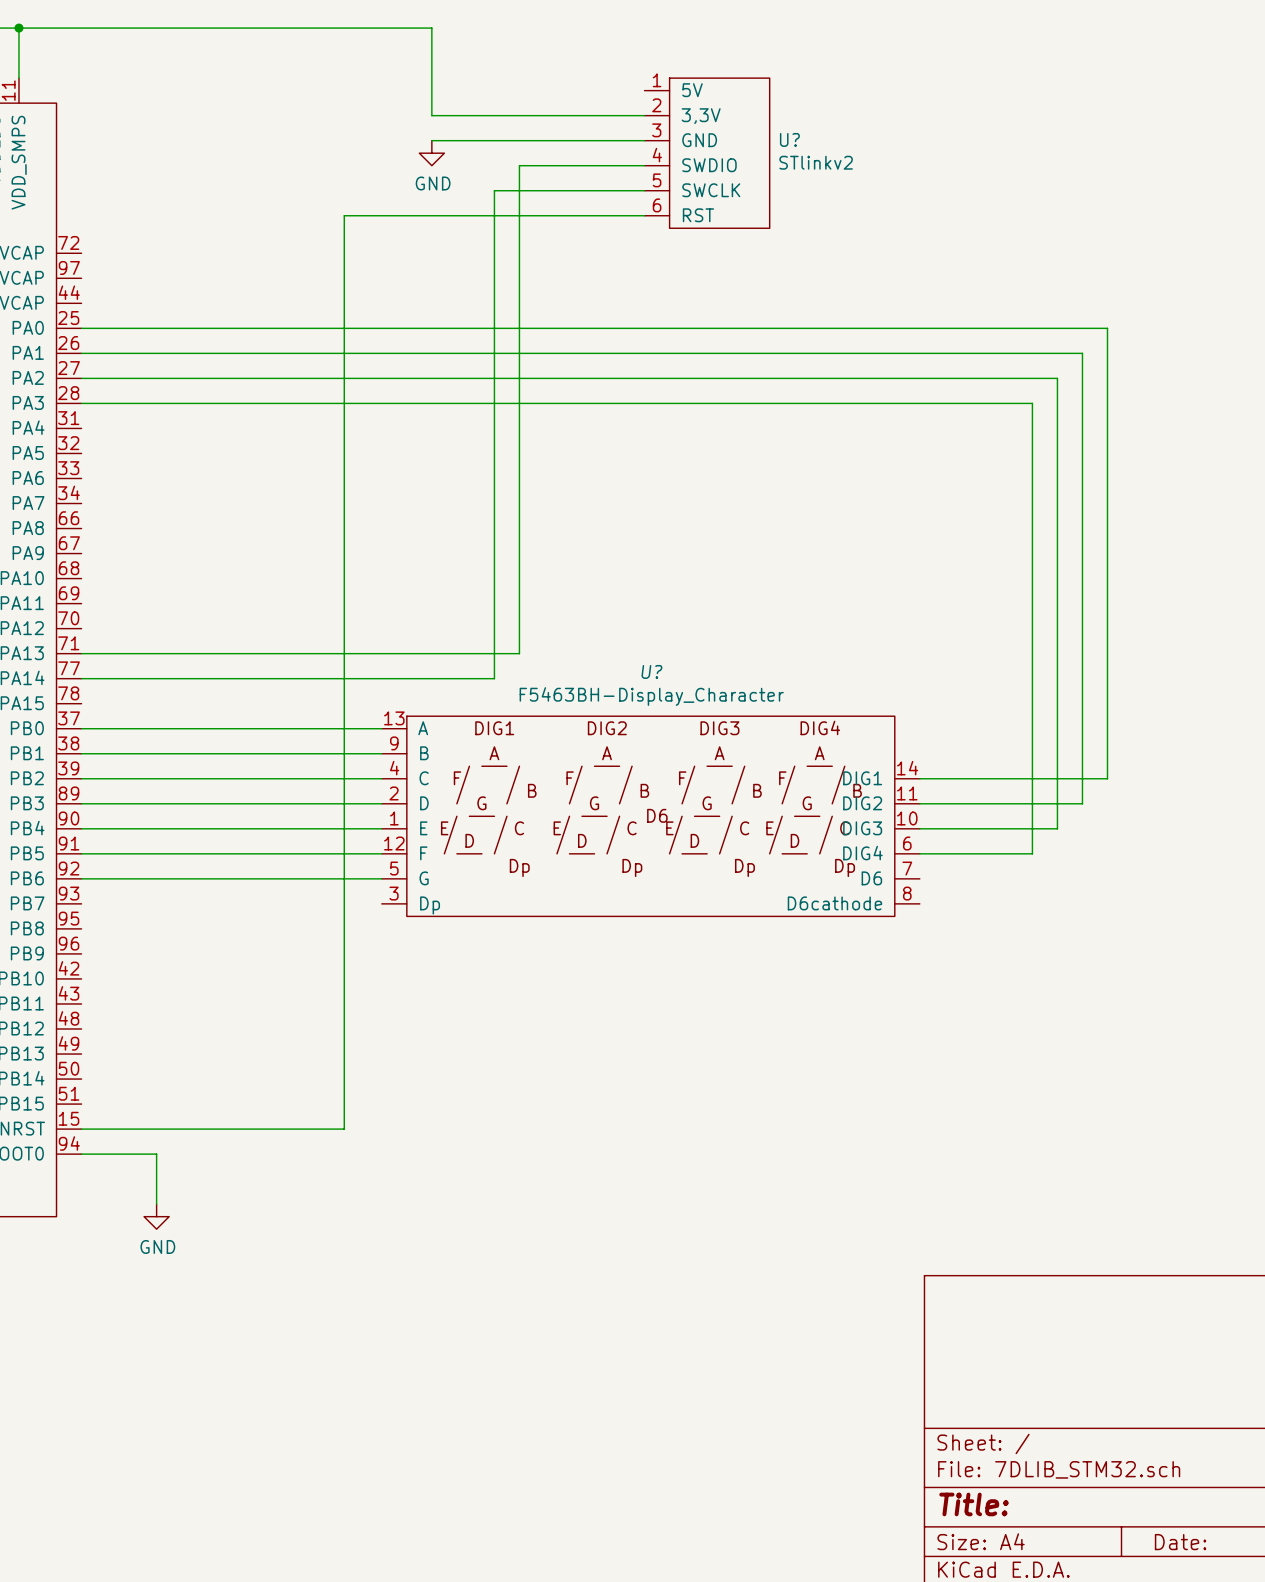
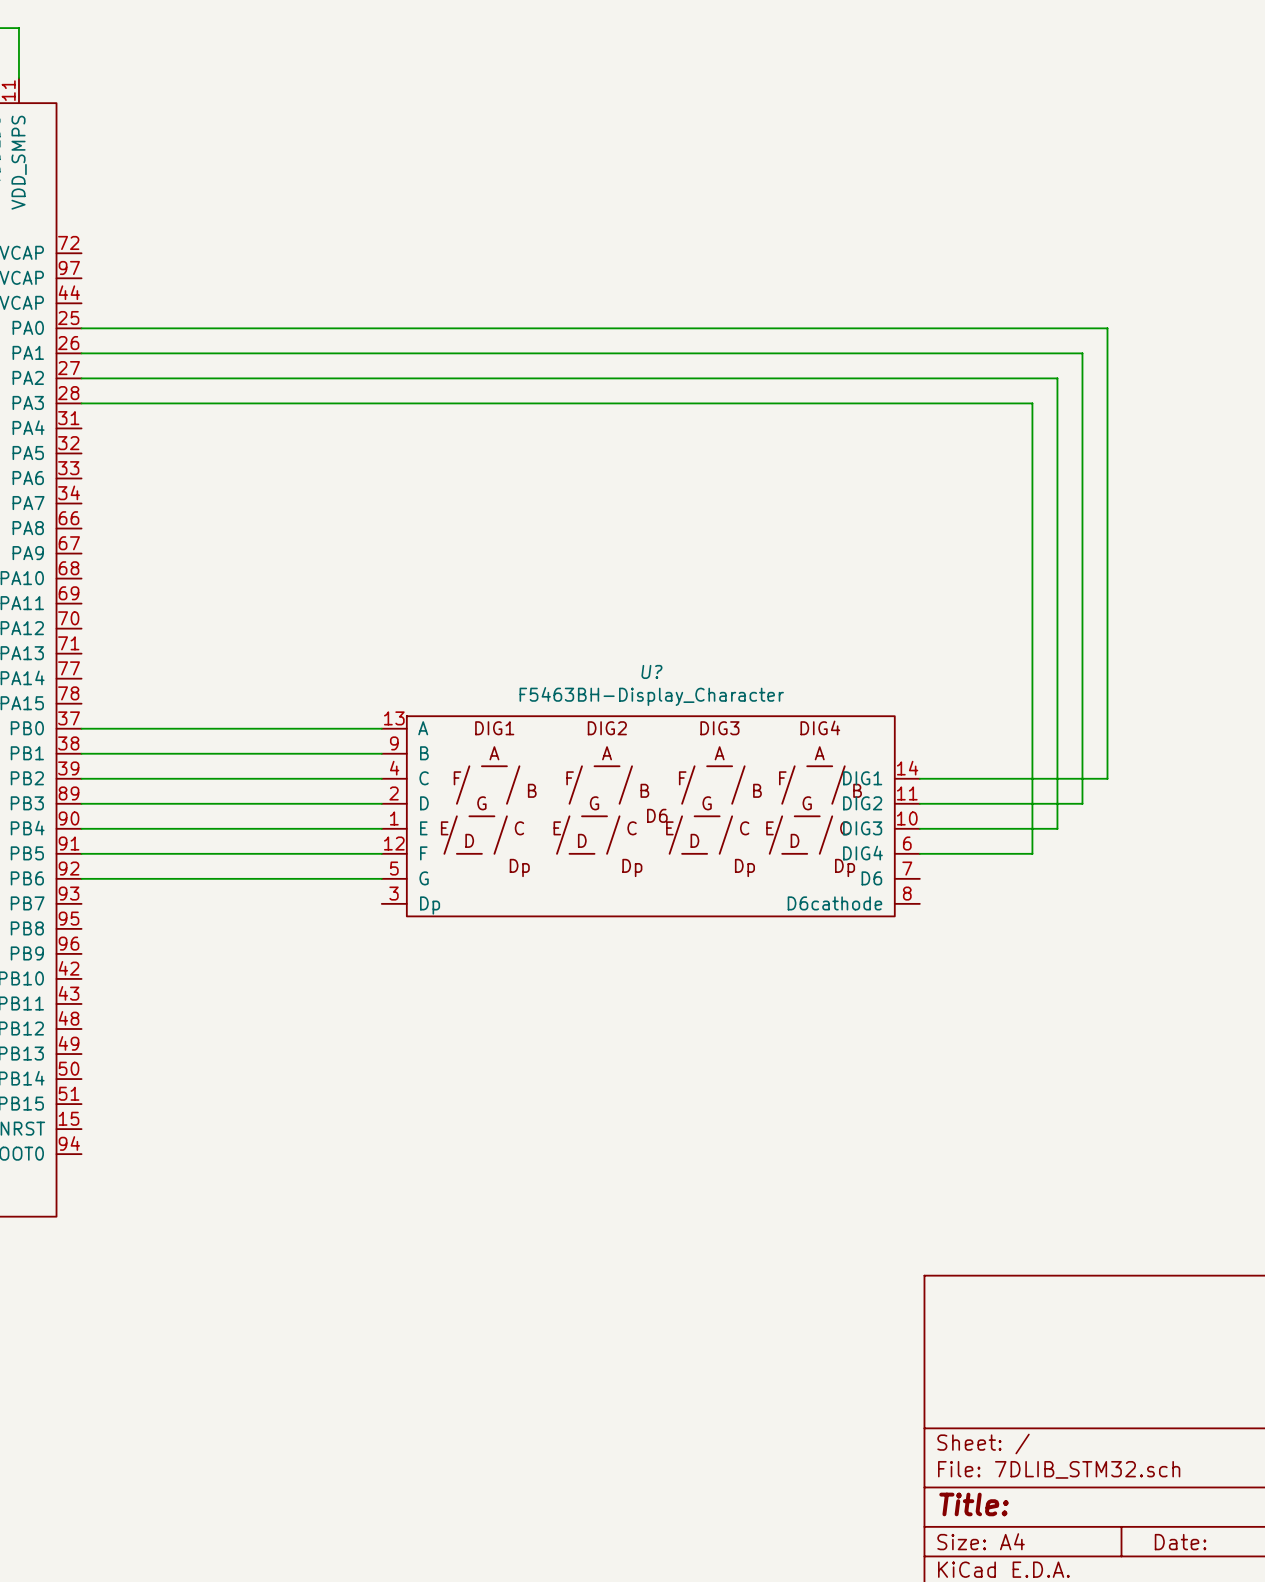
wire: (18, 28) (431, 28) (431, 115) (644, 115) -> none
junction: (18, 28) -> none
wire: (431, 140) (644, 140) -> none
power symbol: GND (431, 153) -> none
U?: STlinkv2 (707, 153) -> none
wire: (644, 165) (519, 165) (519, 653) (81, 653) -> none
wire: (644, 190) (494, 190) (494, 678) (81, 678) -> none
wire: (644, 215) (344, 215) (344, 1129) (81, 1129) -> none
wire: (81, 1154) (156, 1154) (156, 1204) -> none
power symbol: GND (156, 1216) -> none

